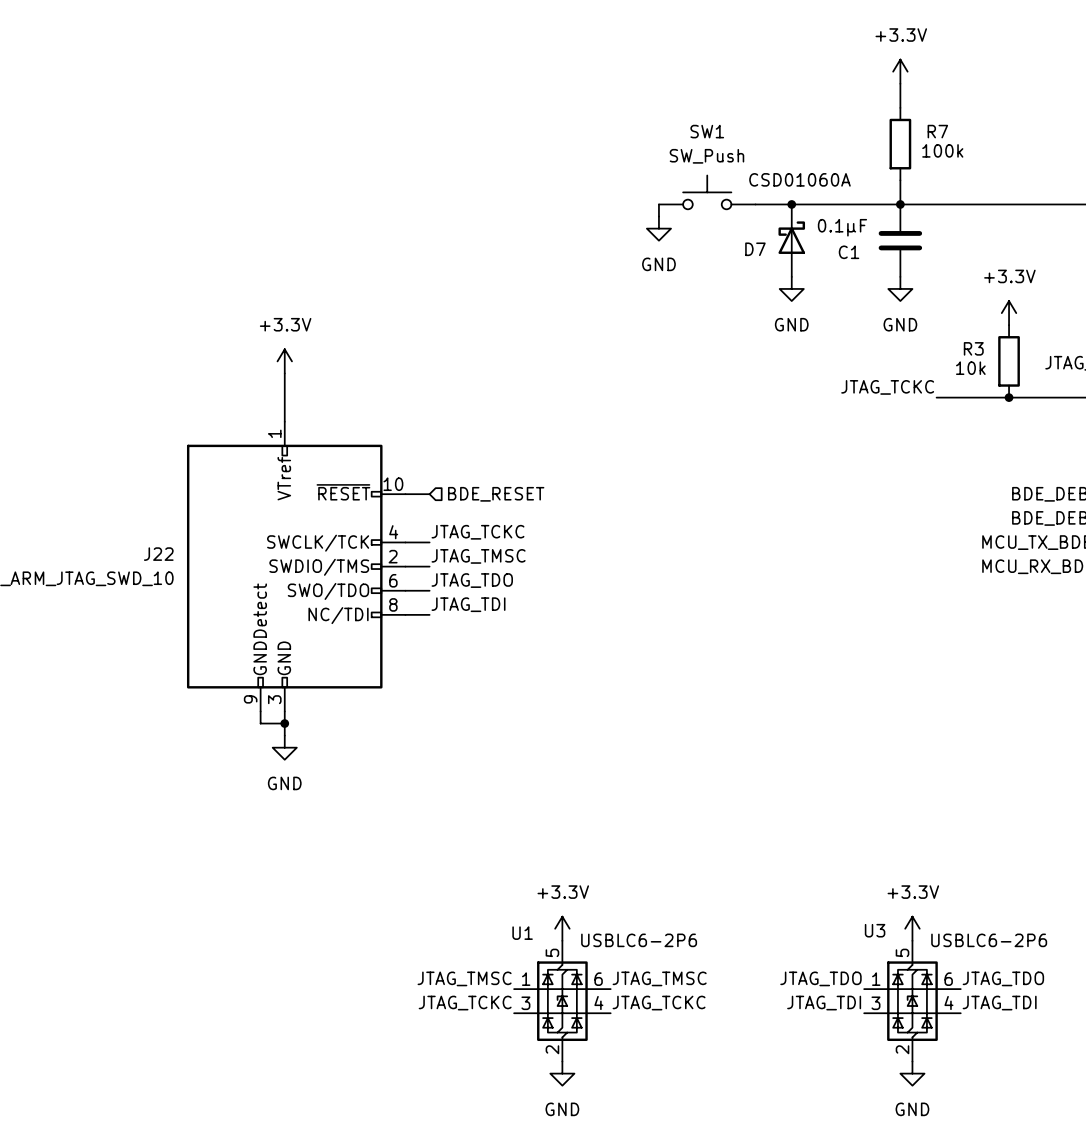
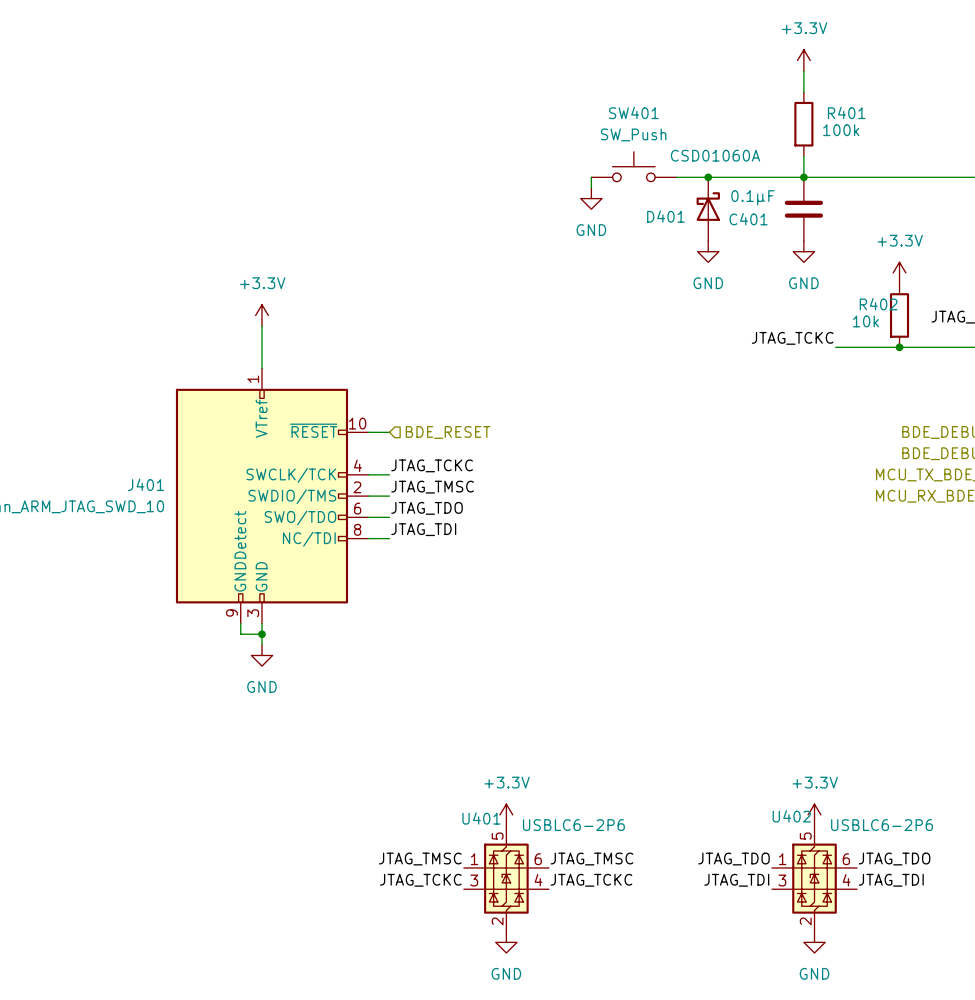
SW1 name: SW1 (707, 131) -> SW401 (633, 112)
R7 name: R7 (937, 131) -> R401 (846, 112)
D7 name: D7 (755, 249) -> D401 (665, 216)
C1 name: C1 (849, 252) -> C401 (748, 219)
R3 name: R3 (973, 348) -> R402 (878, 304)
J22 name: J22 (158, 554) -> J401 (146, 484)
U3 name: U3 (875, 930) -> U402 (791, 816)
U1 name: U1 (522, 933) -> U401 (481, 818)

